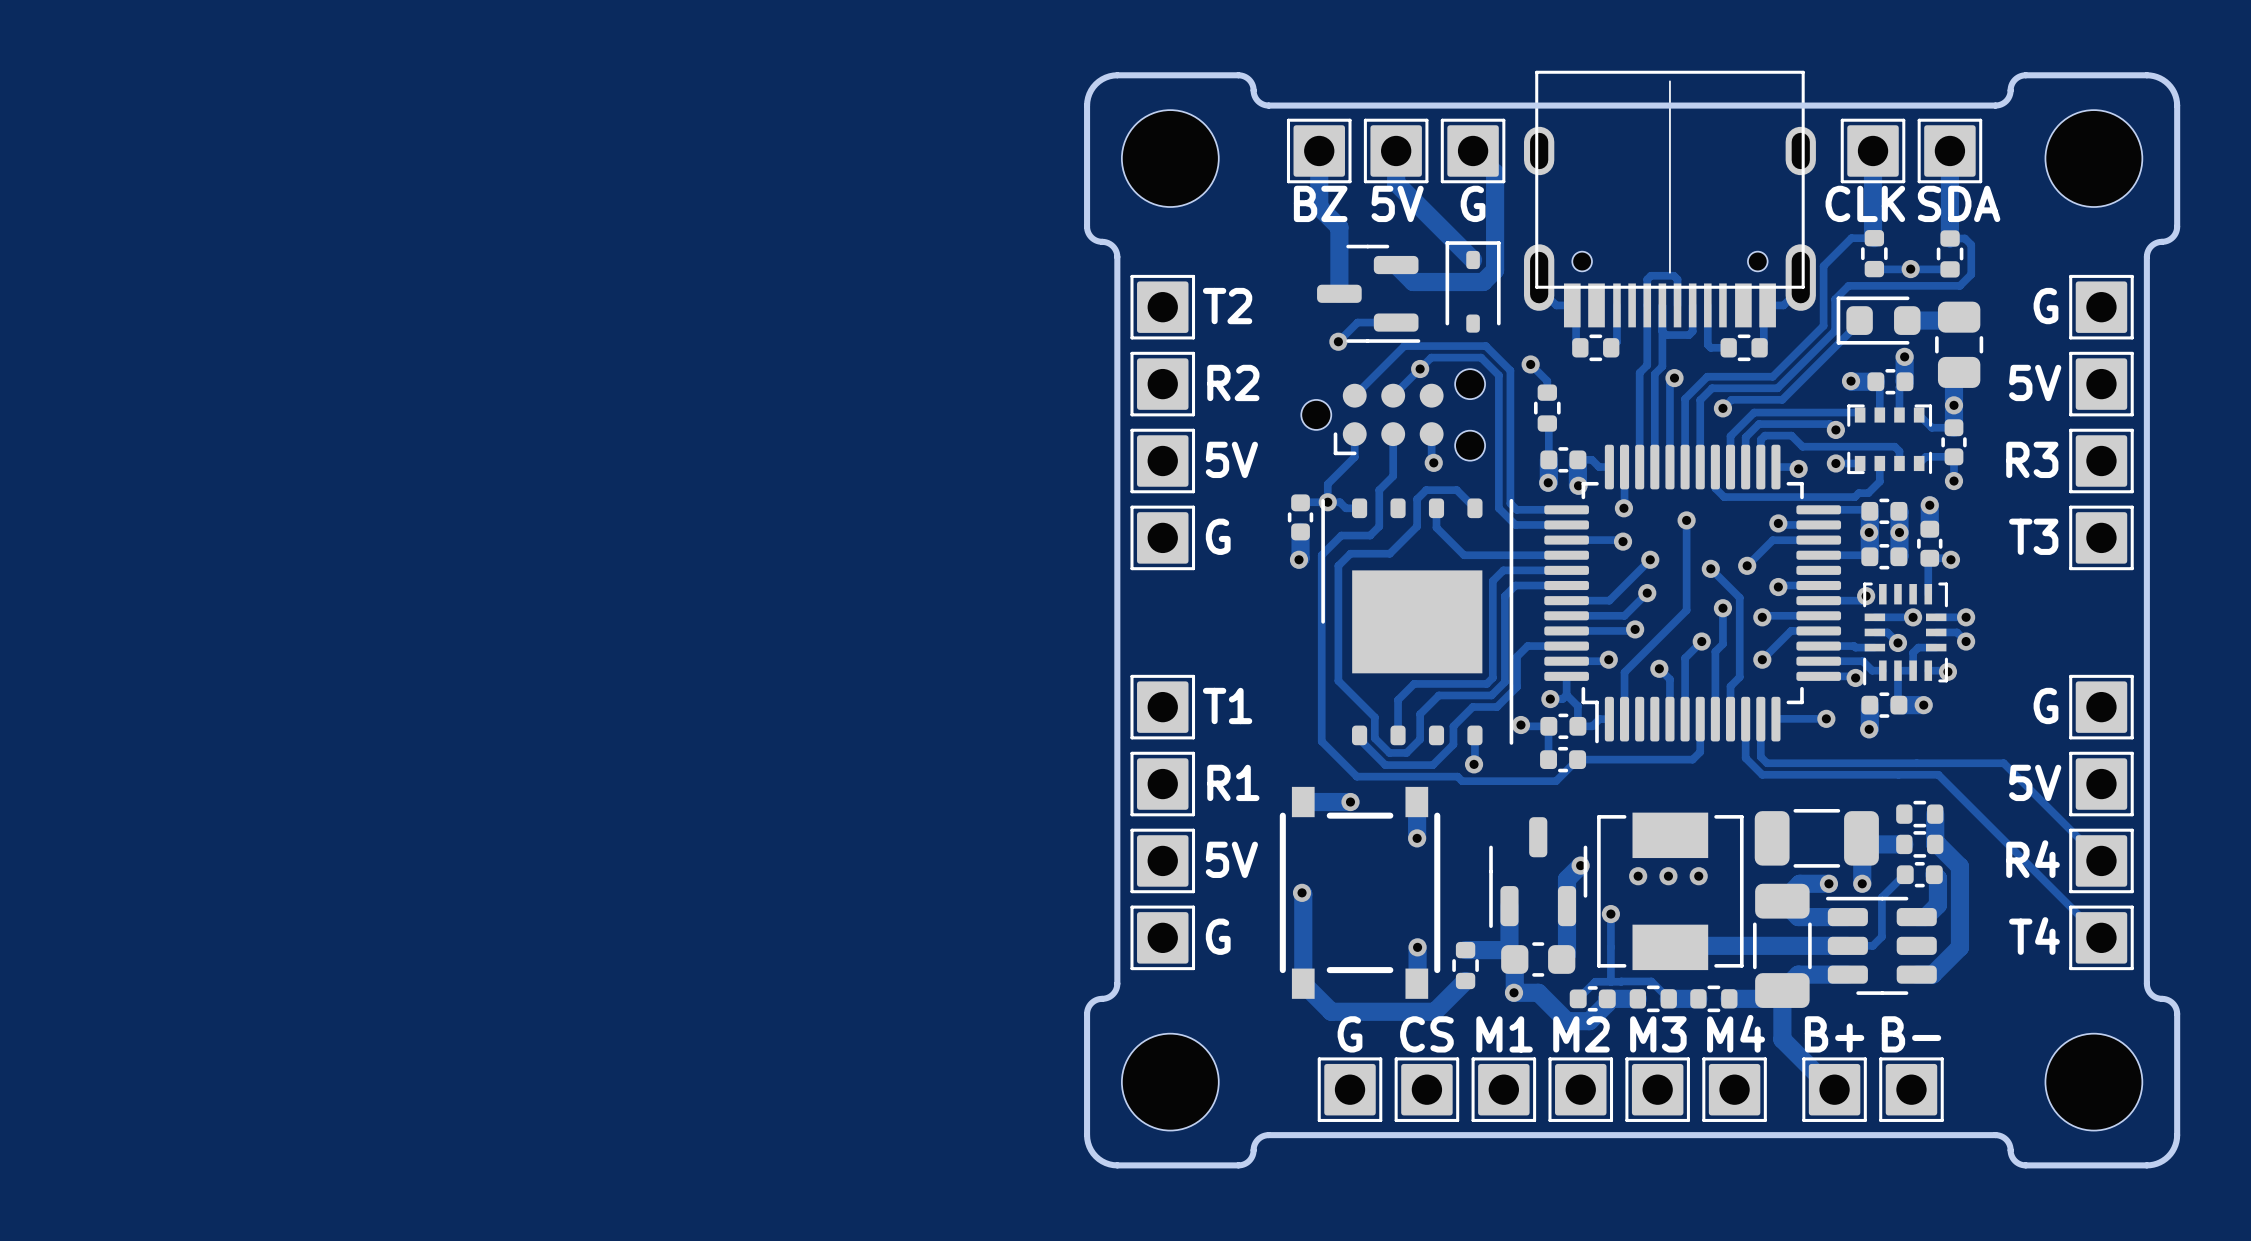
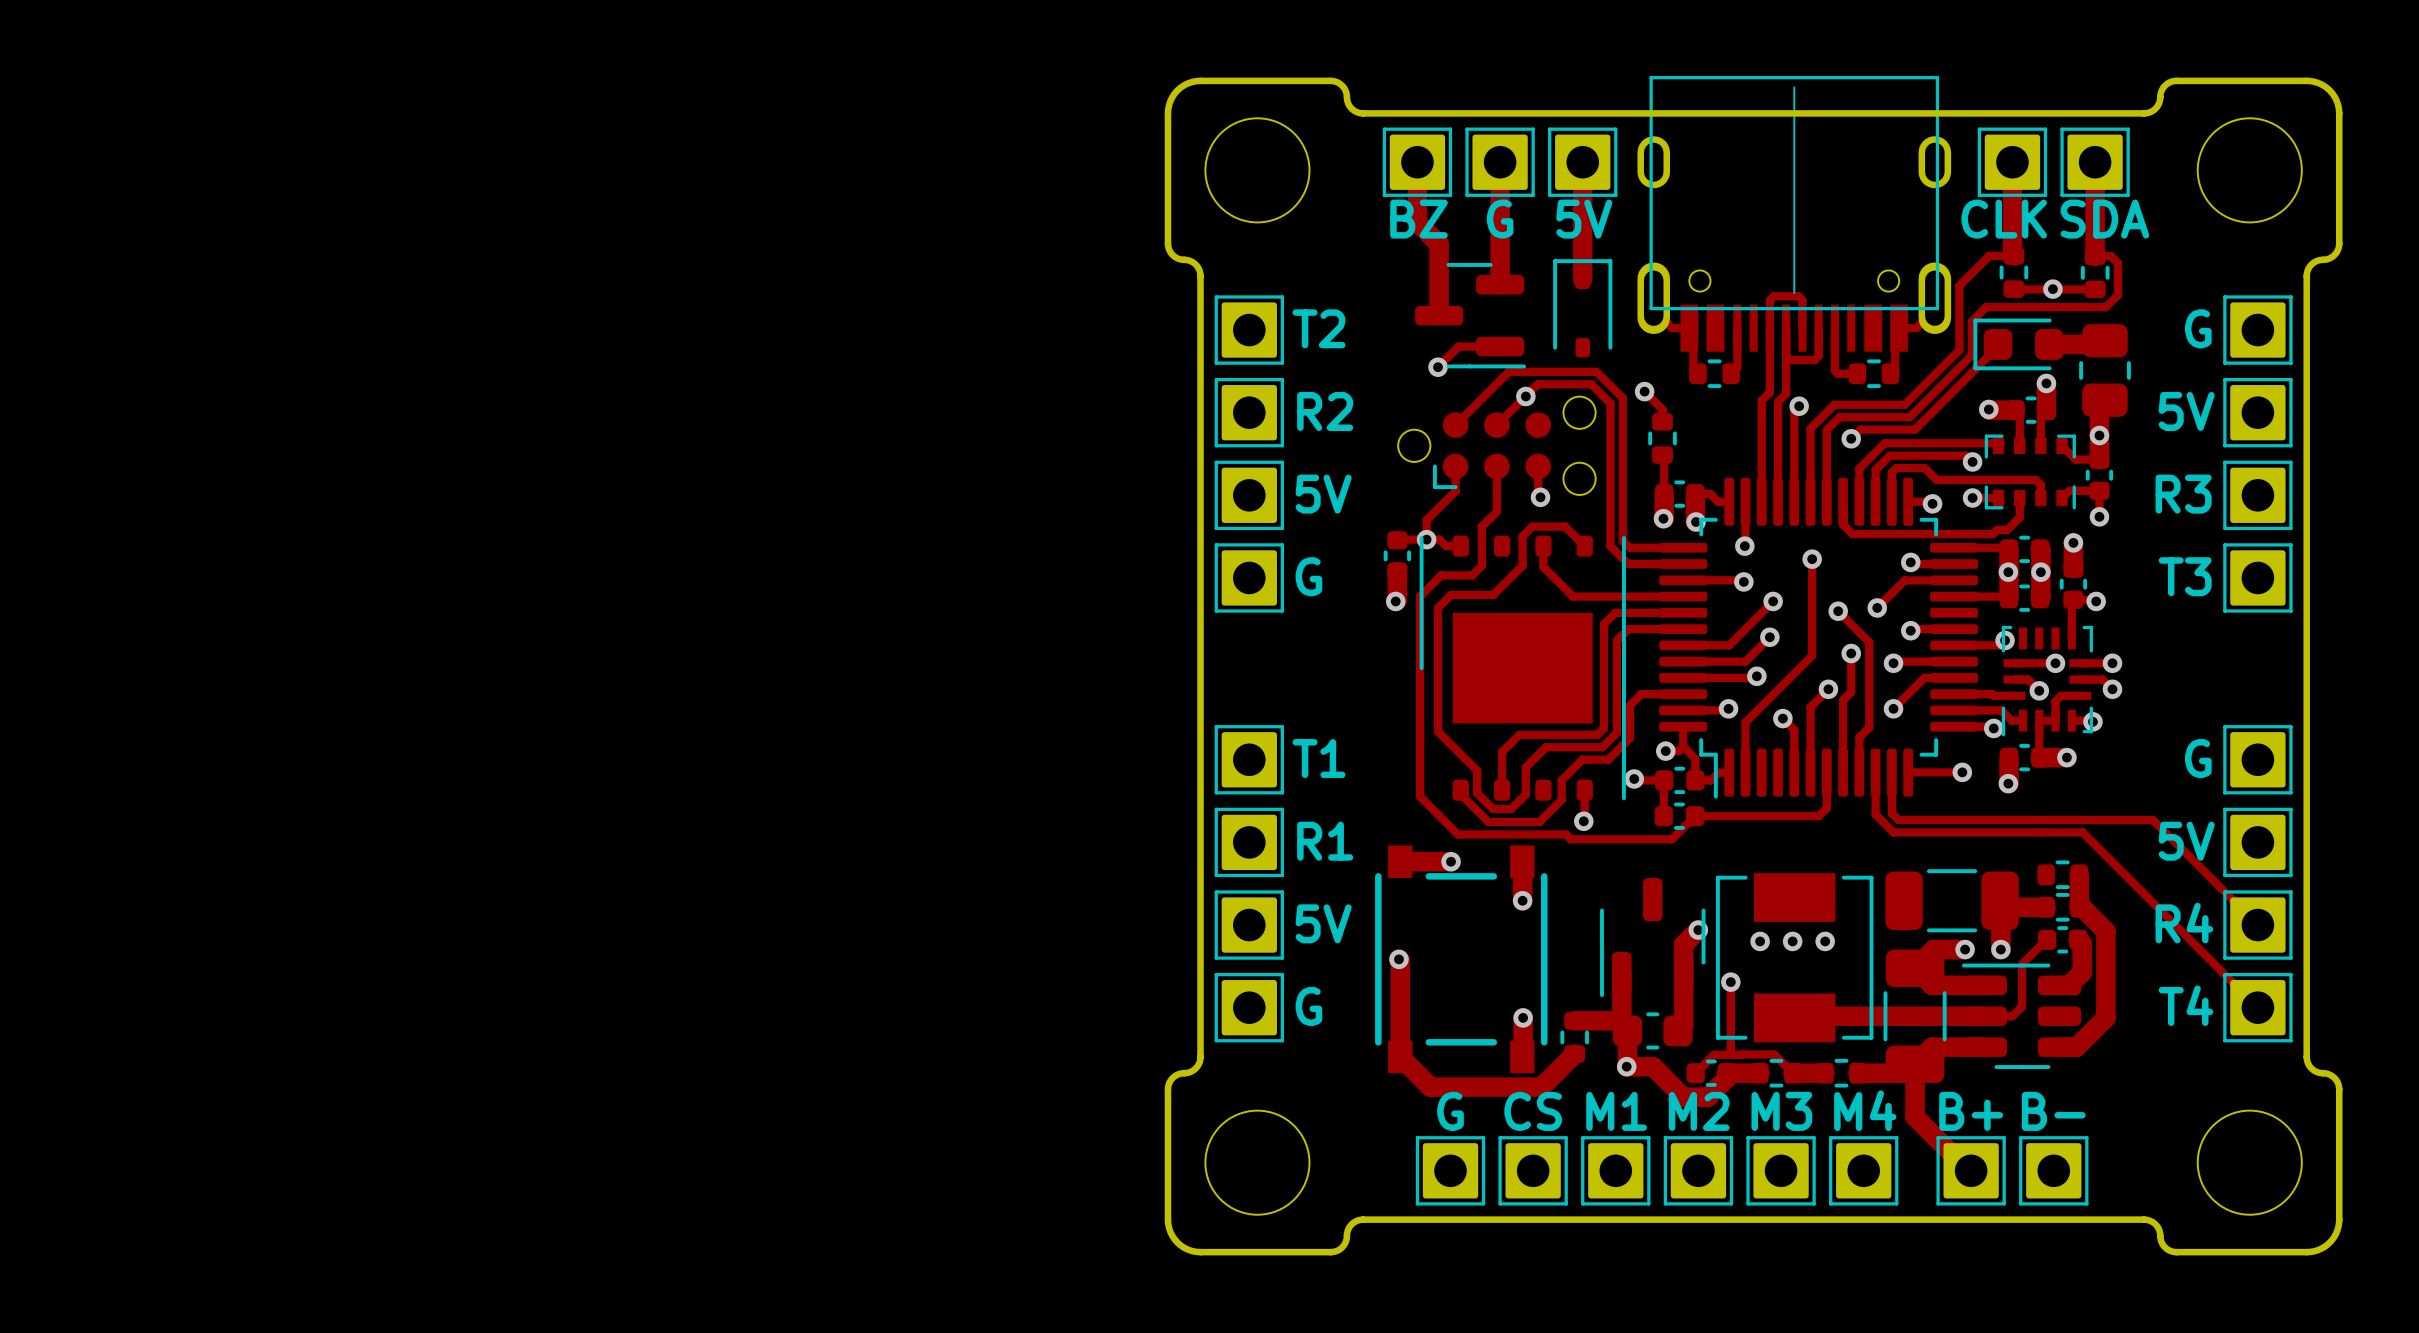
track: (1473, 150) (1495, 173) (1495, 270) (1483, 282) (1413, 282) (1396, 265) -> (1582, 162) (1582, 279)
track: (1396, 183) (1473, 260) -> (1500, 196) (1500, 284)
text: 5V (1397, 203) -> G (1500, 219)
text: G (1473, 203) -> 5V (1584, 219)

